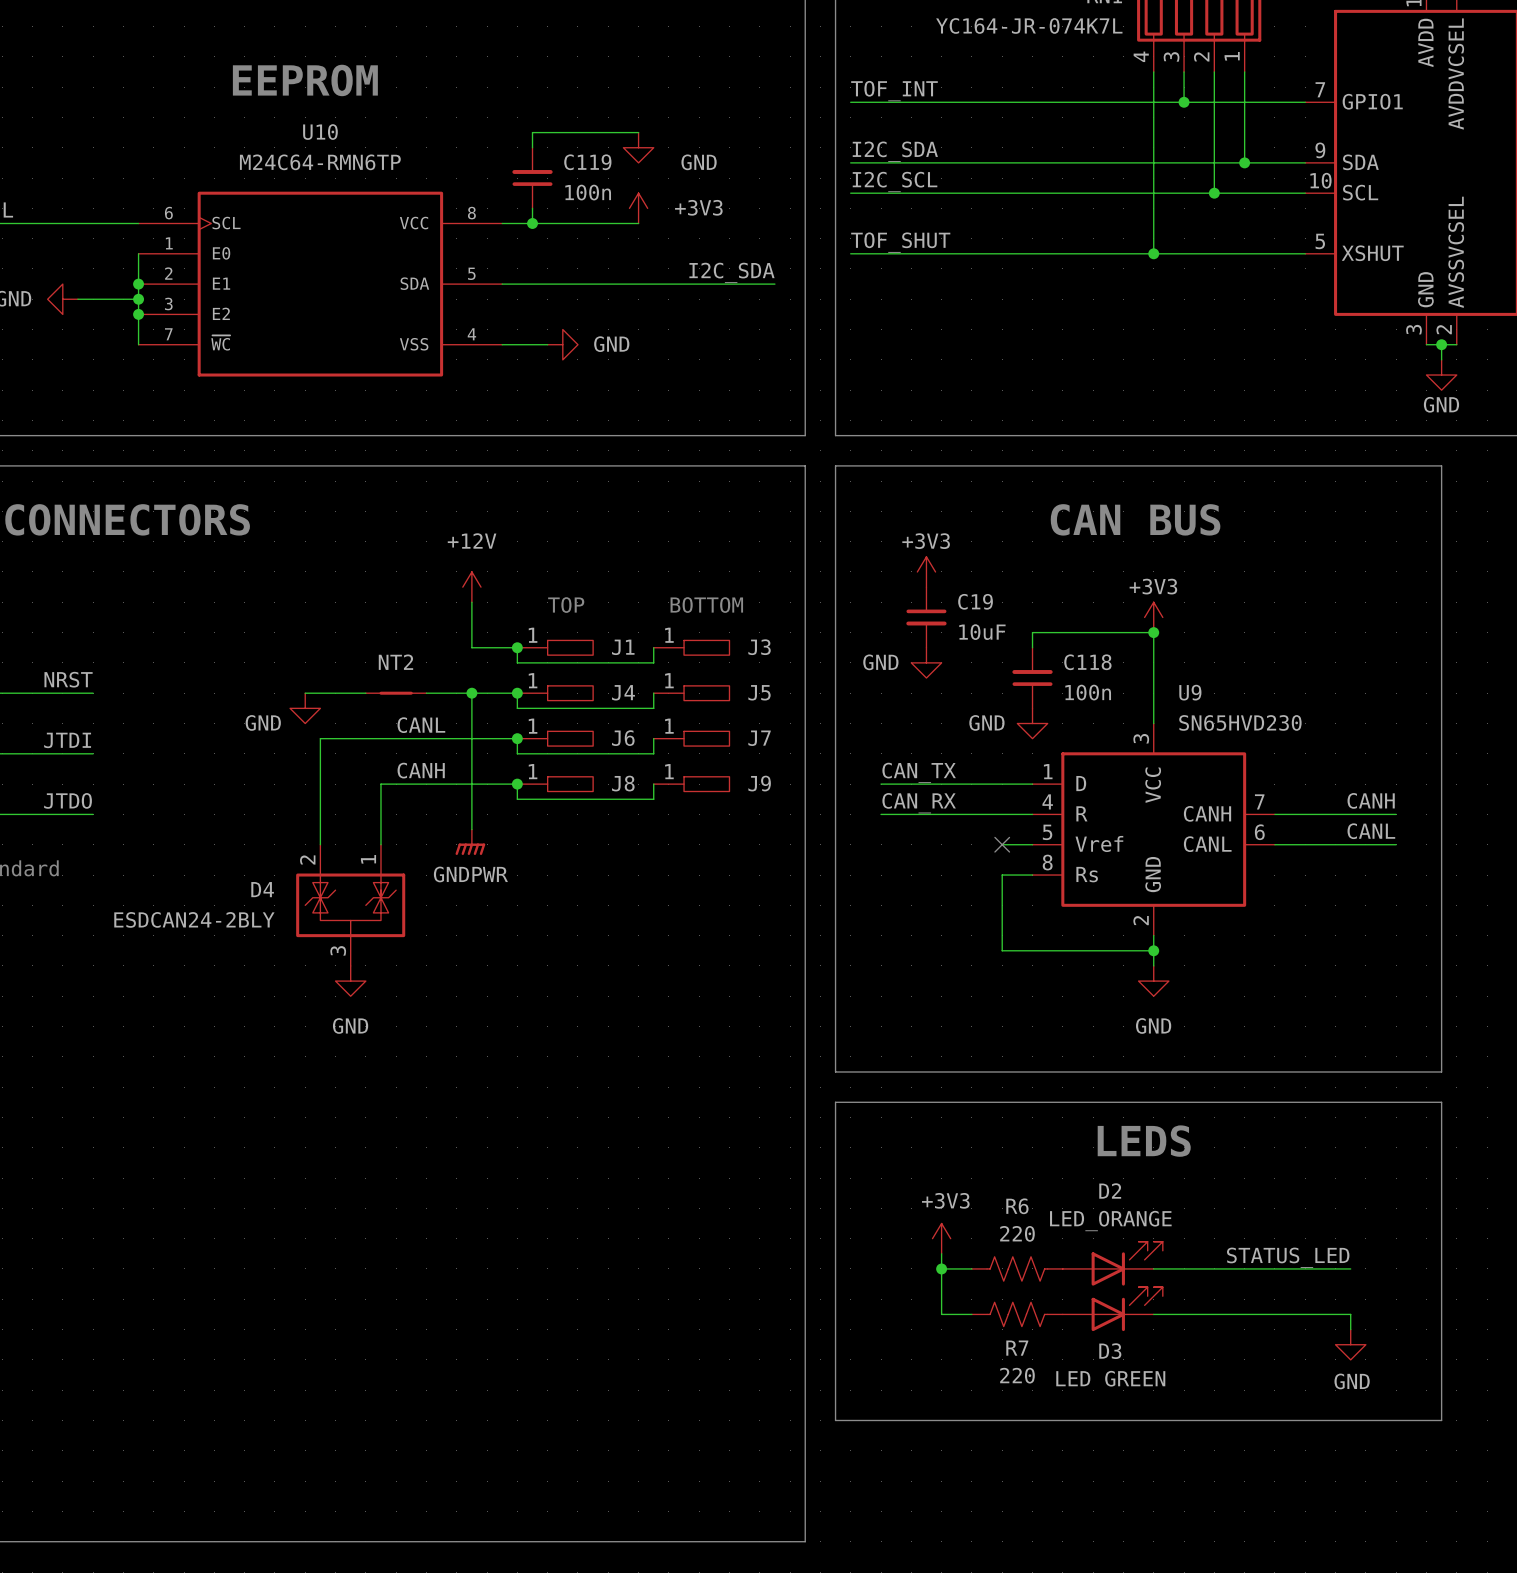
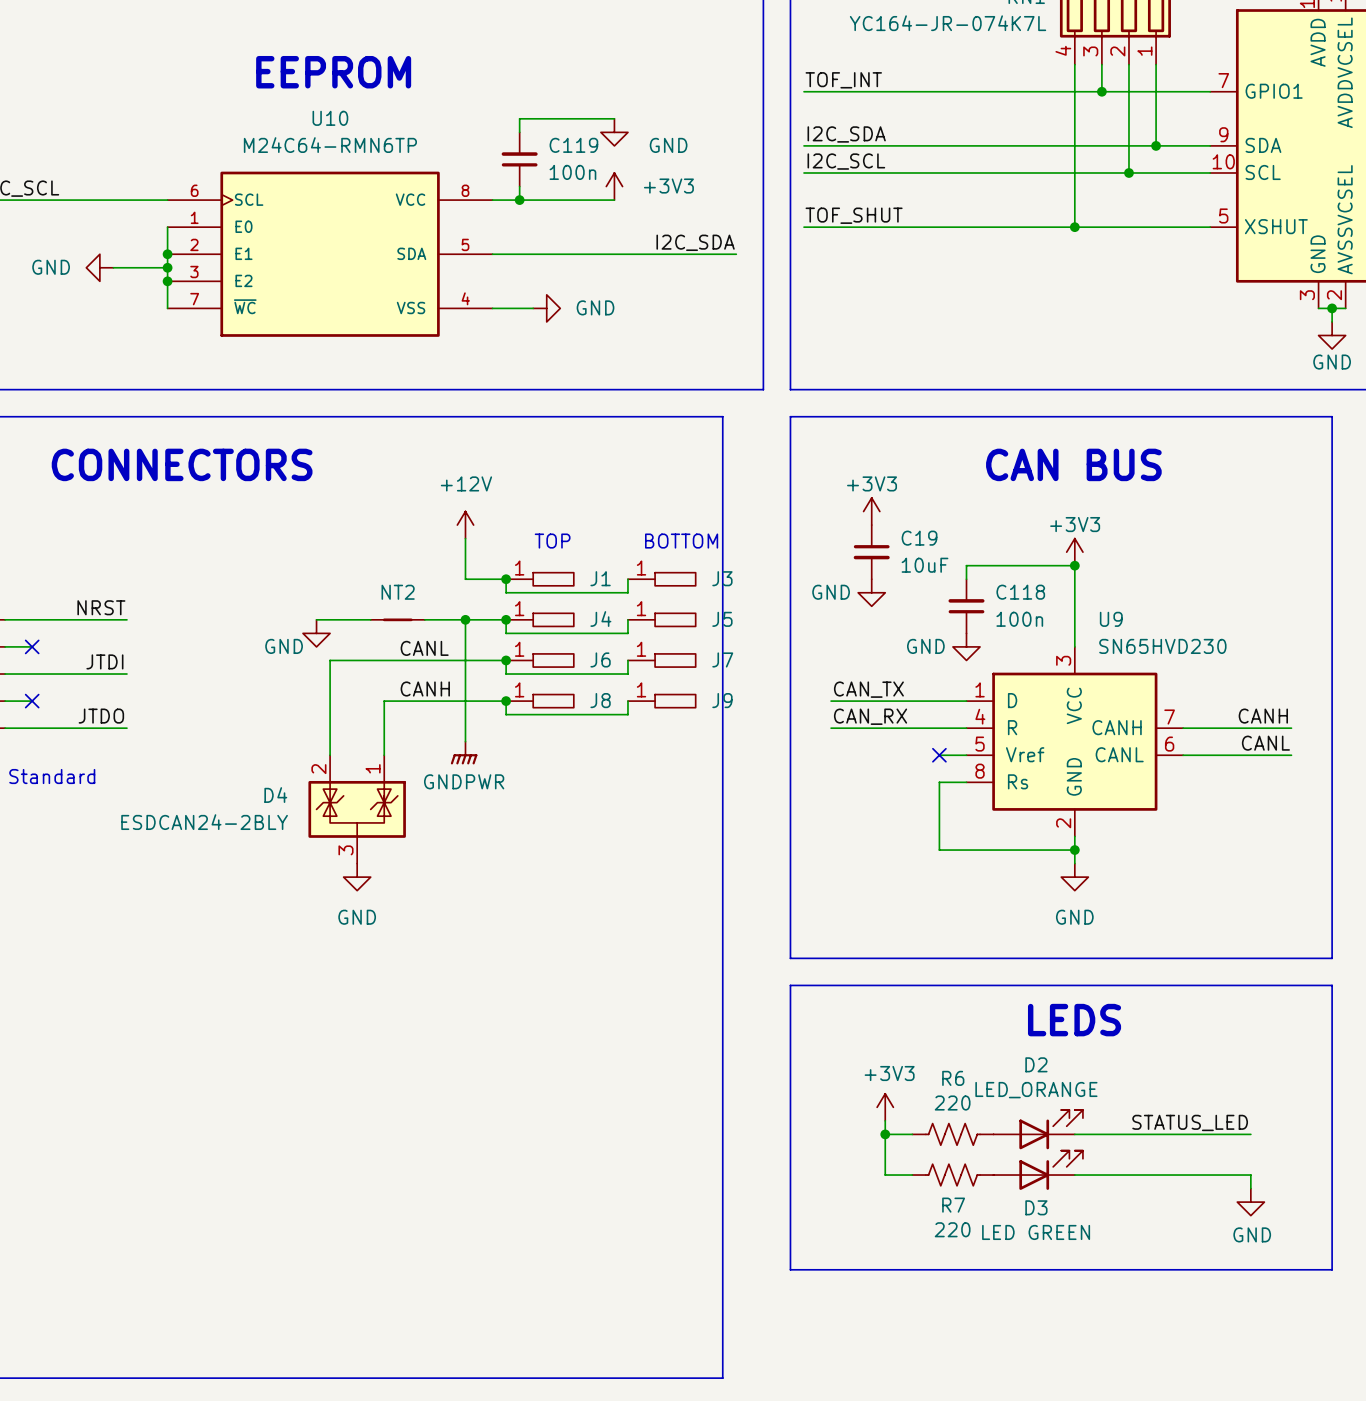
line: (759, 465) (805, 465) (805, 1541) (759, 1541) -> (722, 416) (722, 1378)

